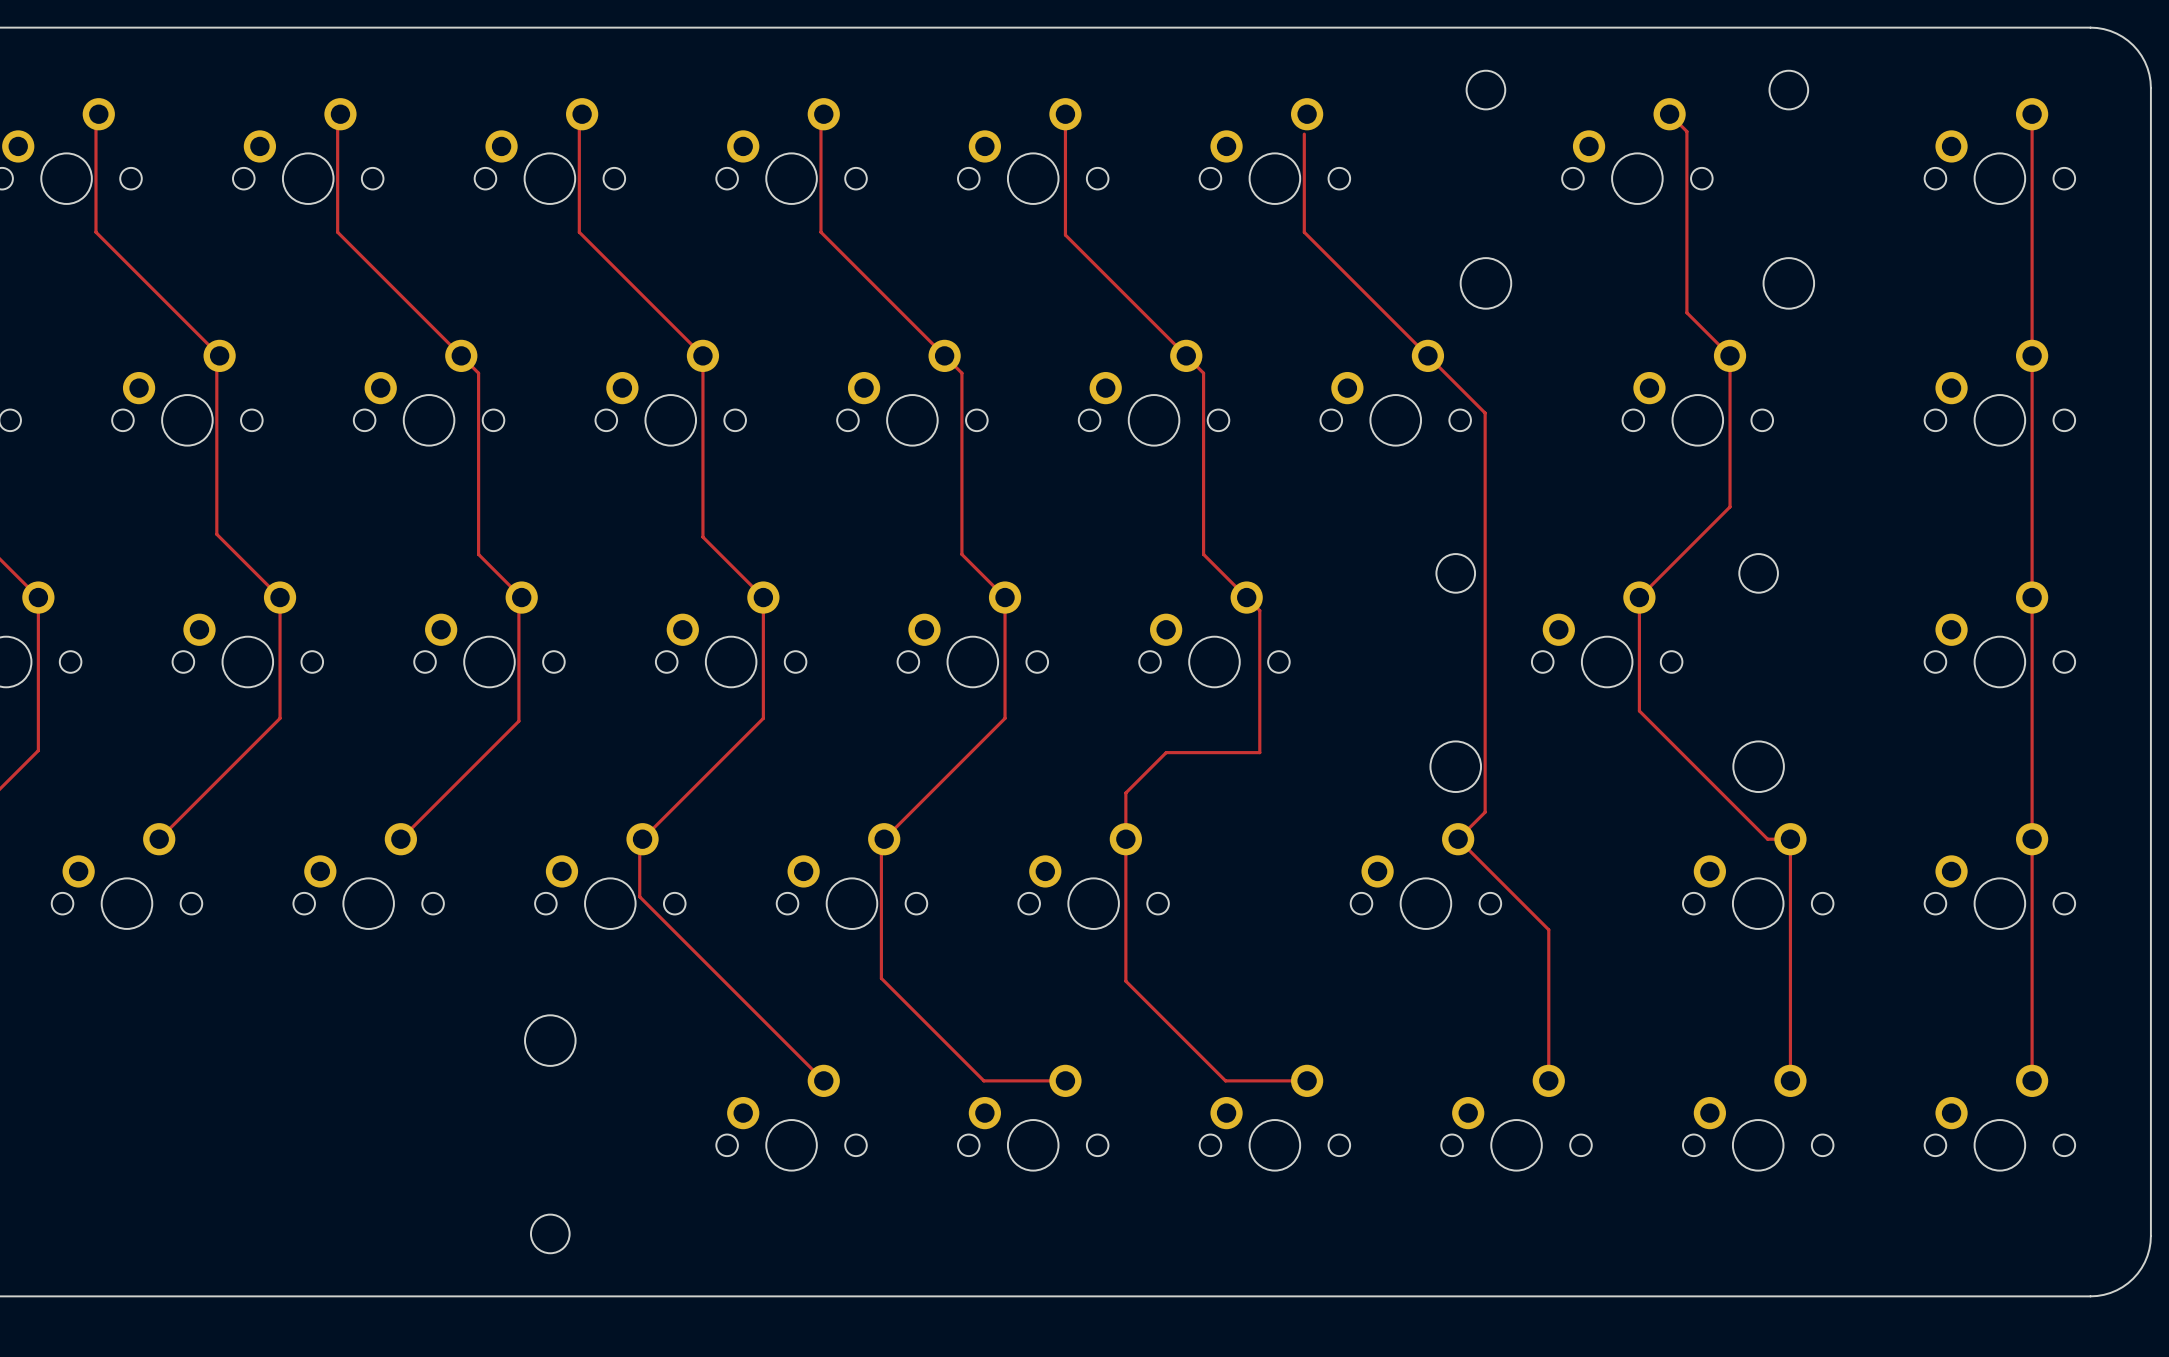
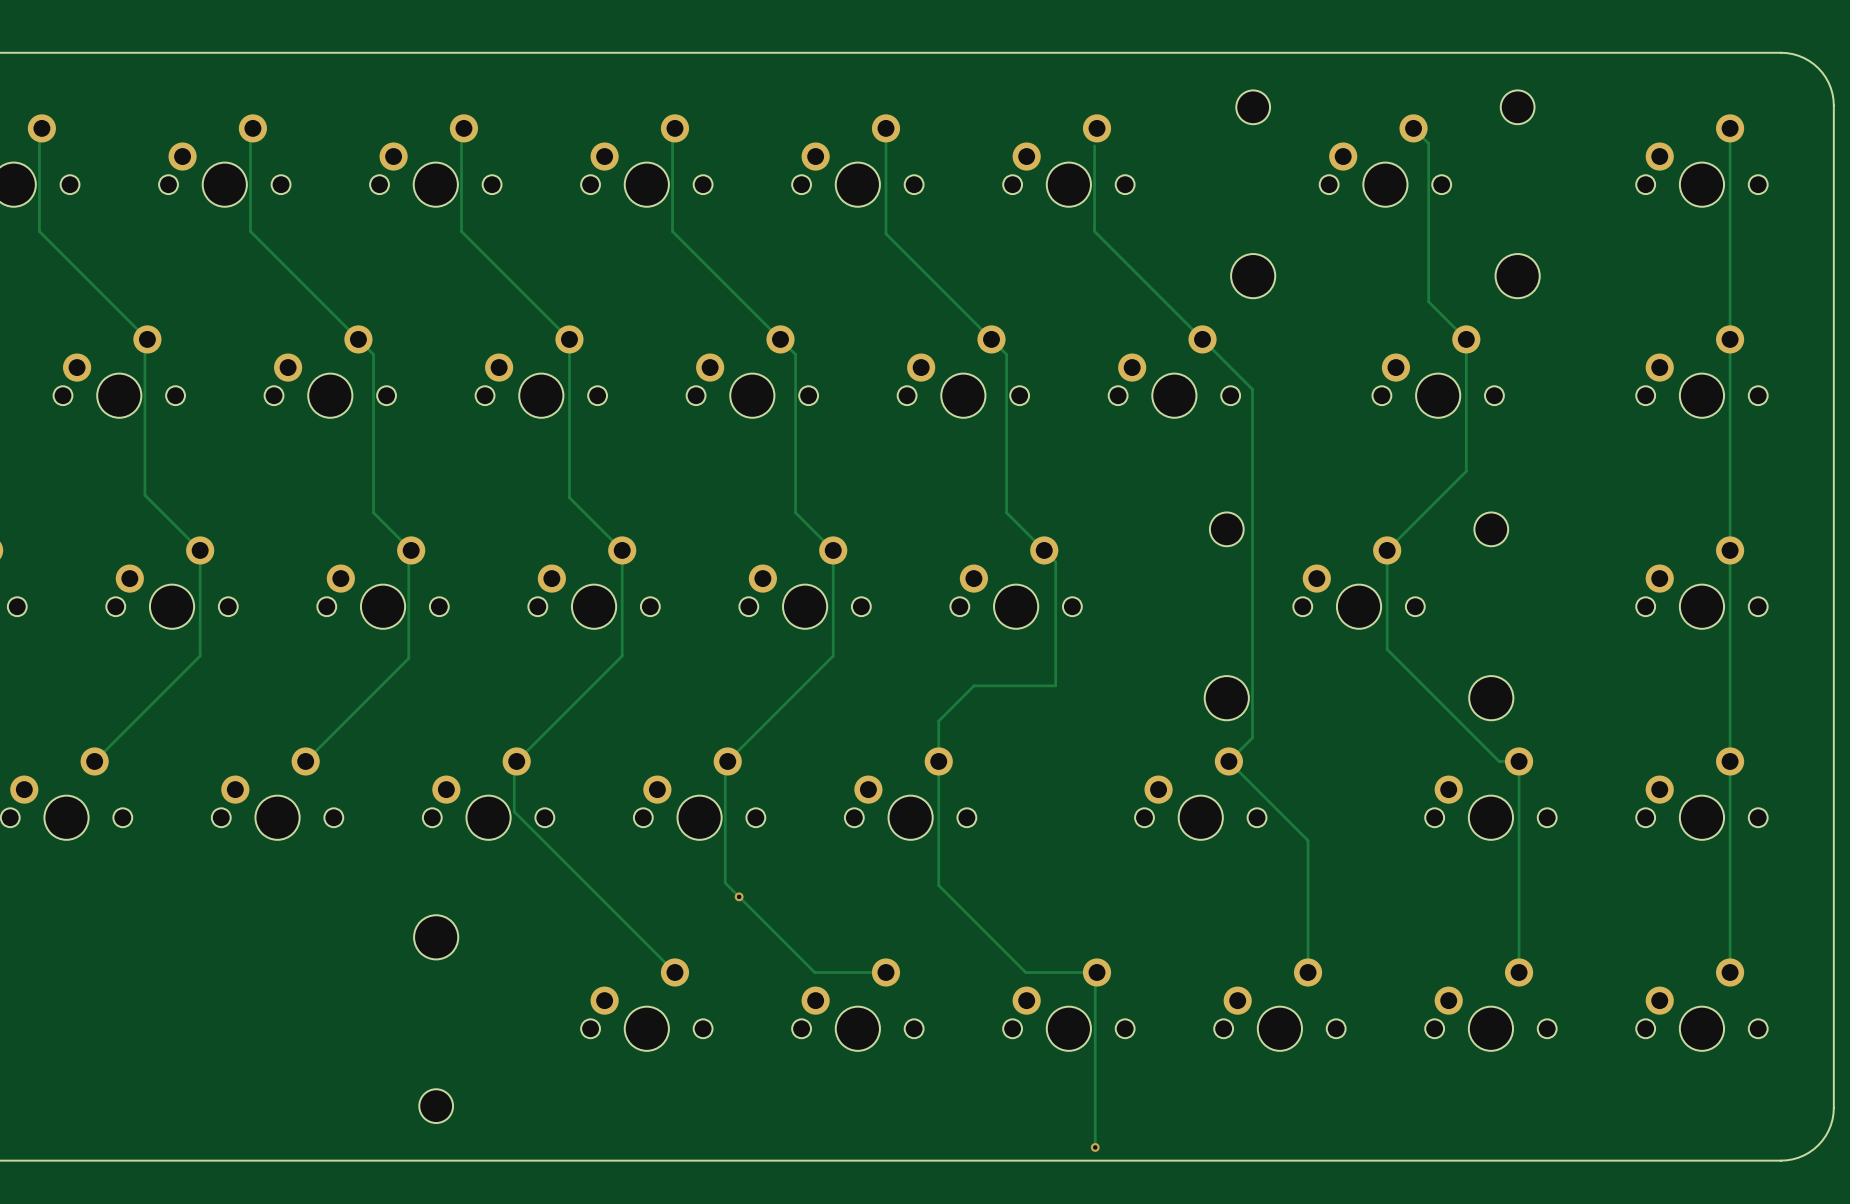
via: none -> (739, 896)
track: none -> (1097, 972) (1095, 974) (1095, 1147)
via: none -> (1095, 1147)

